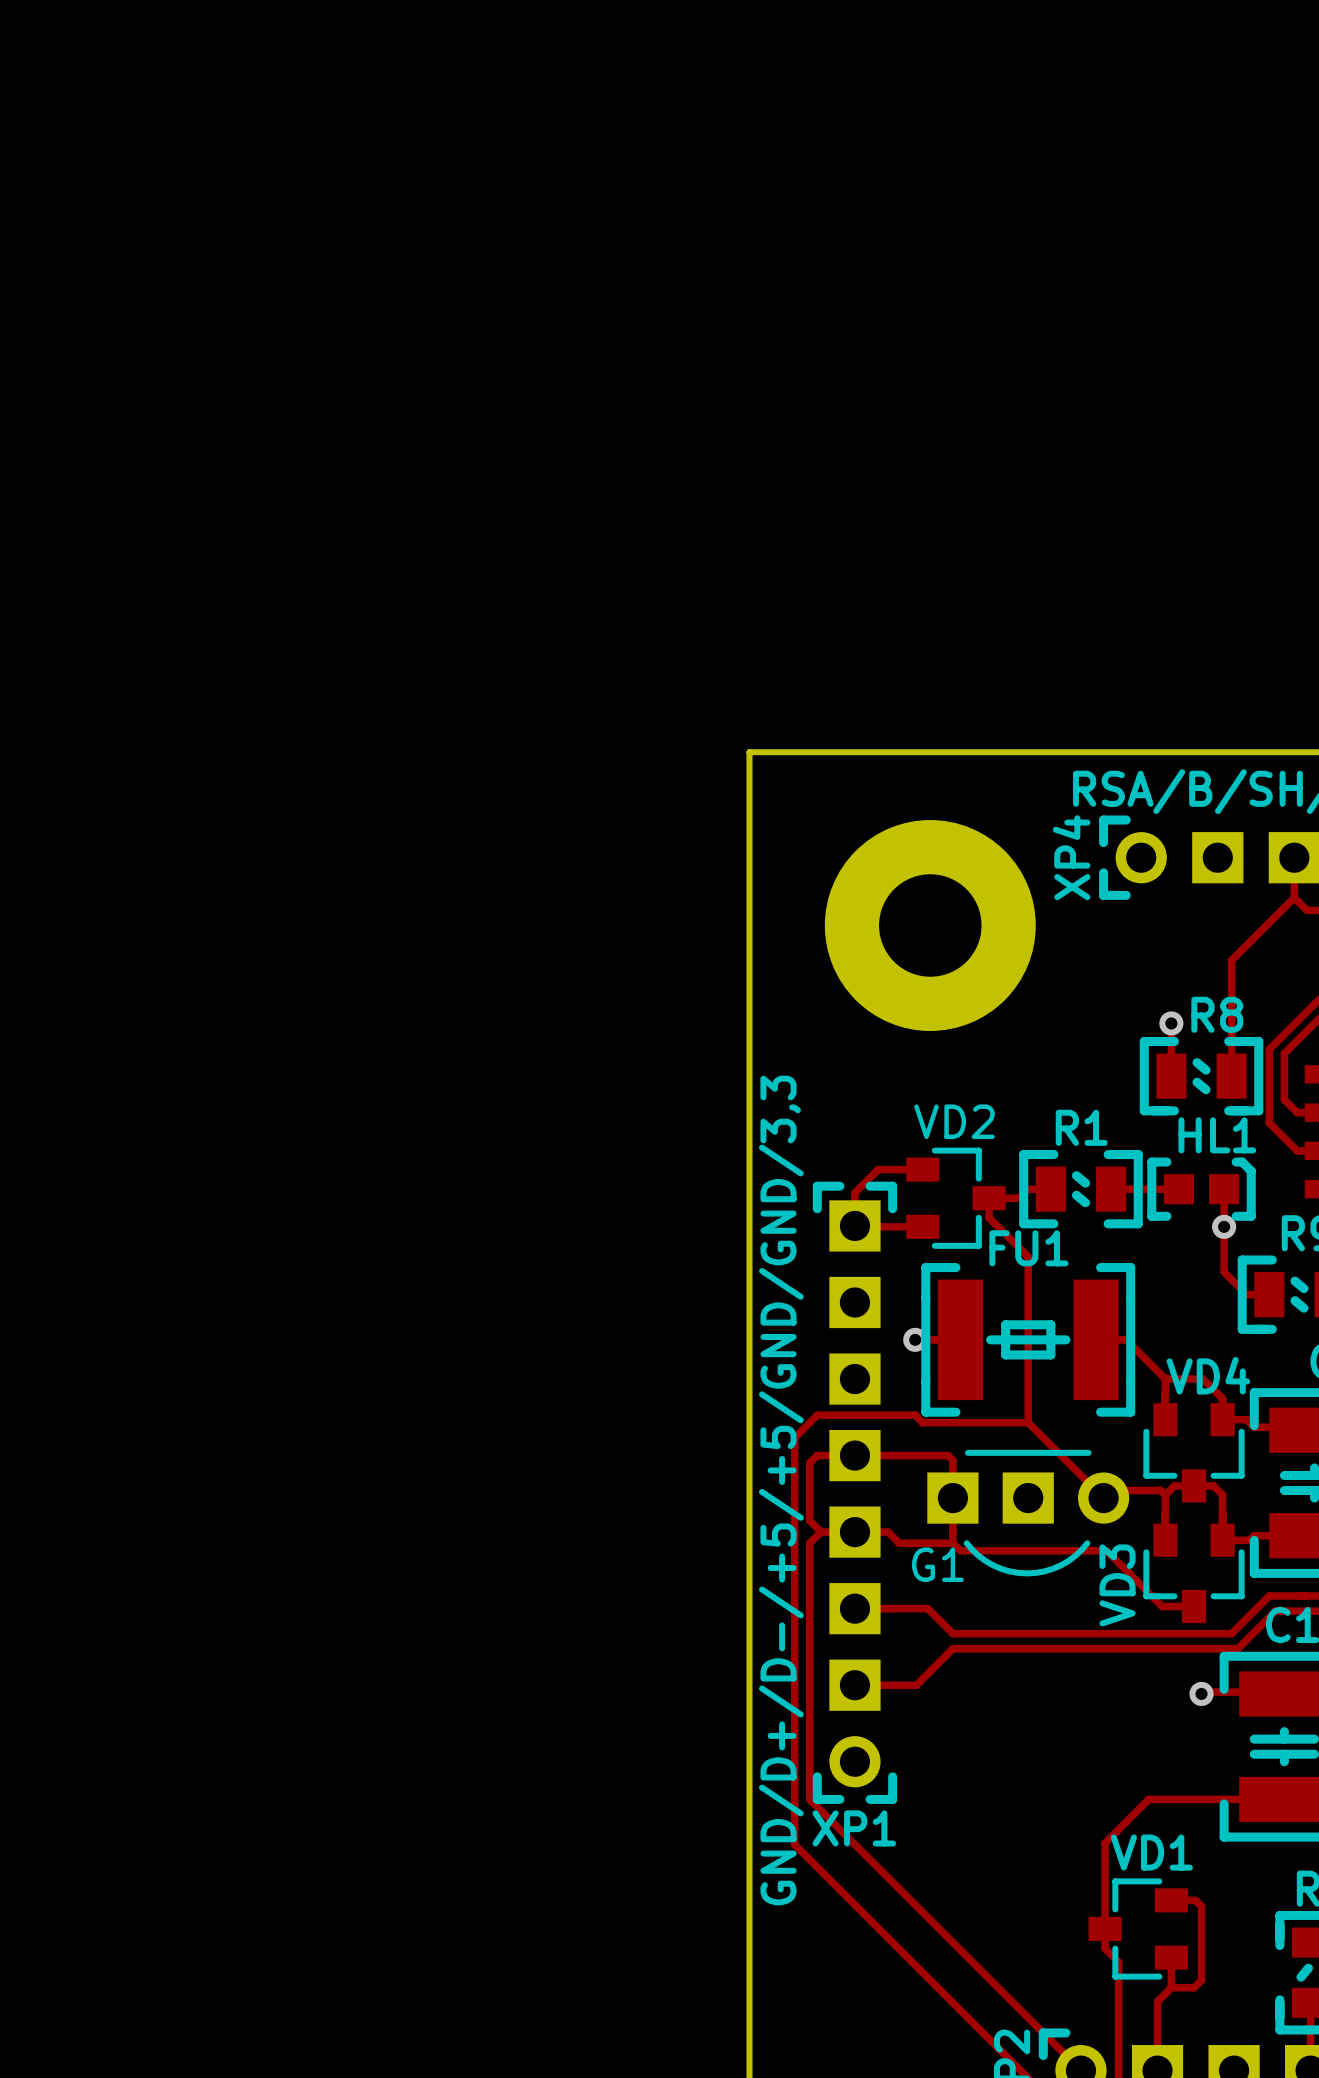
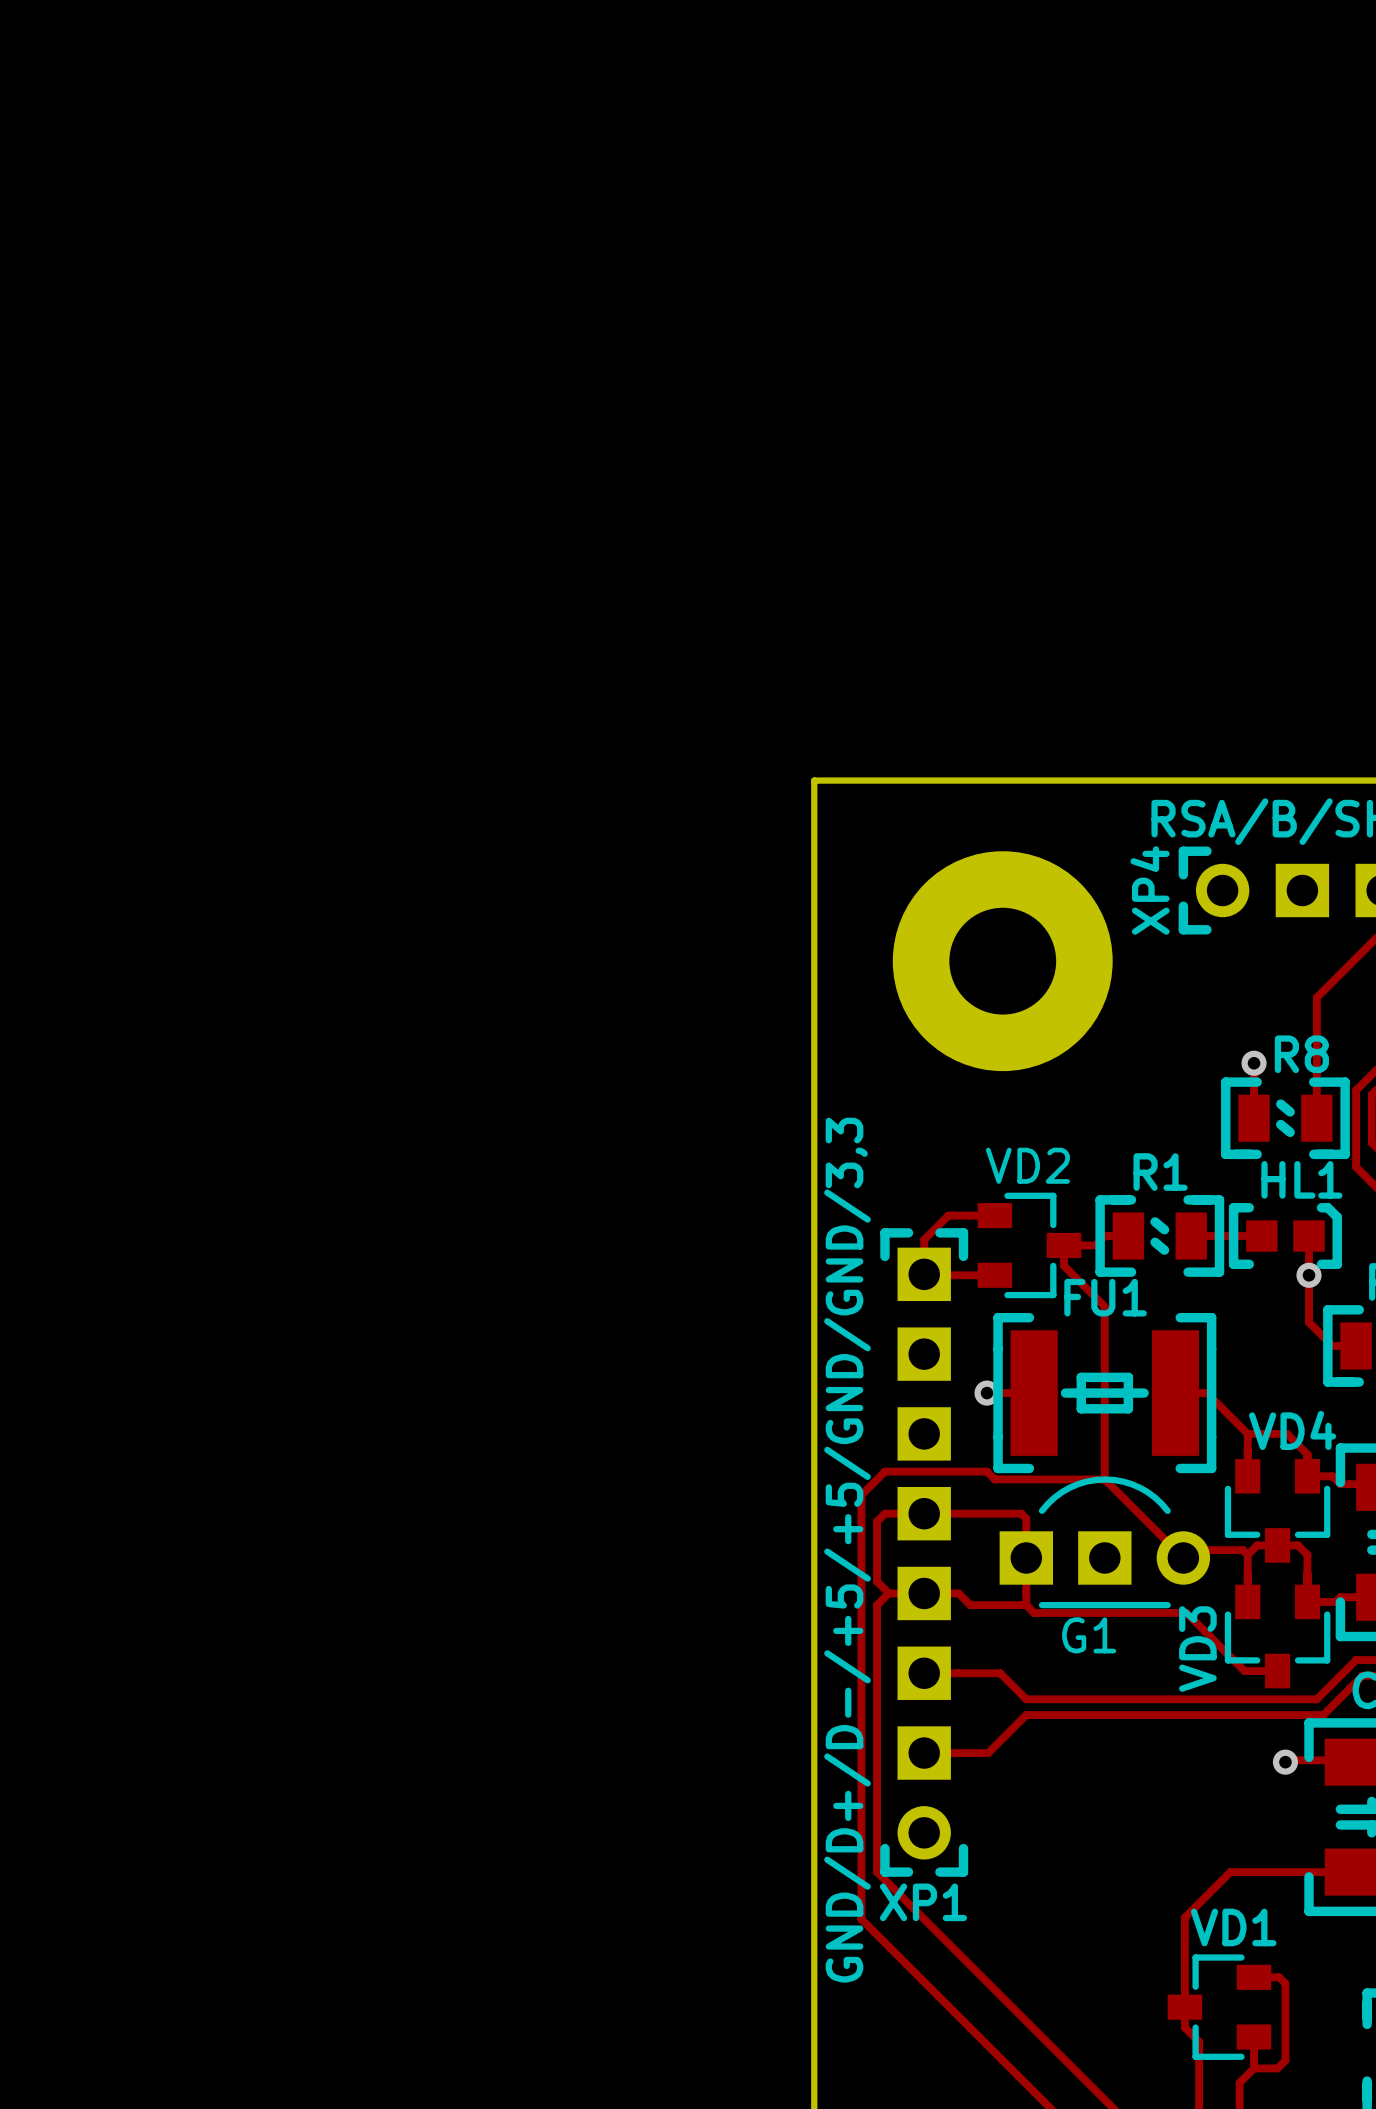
G1 footprint: [927, 1449, 1130, 1577] -> [999, 1476, 1211, 1609]
G1 name position: G1 (937, 1564) -> G1 (1089, 1635)

